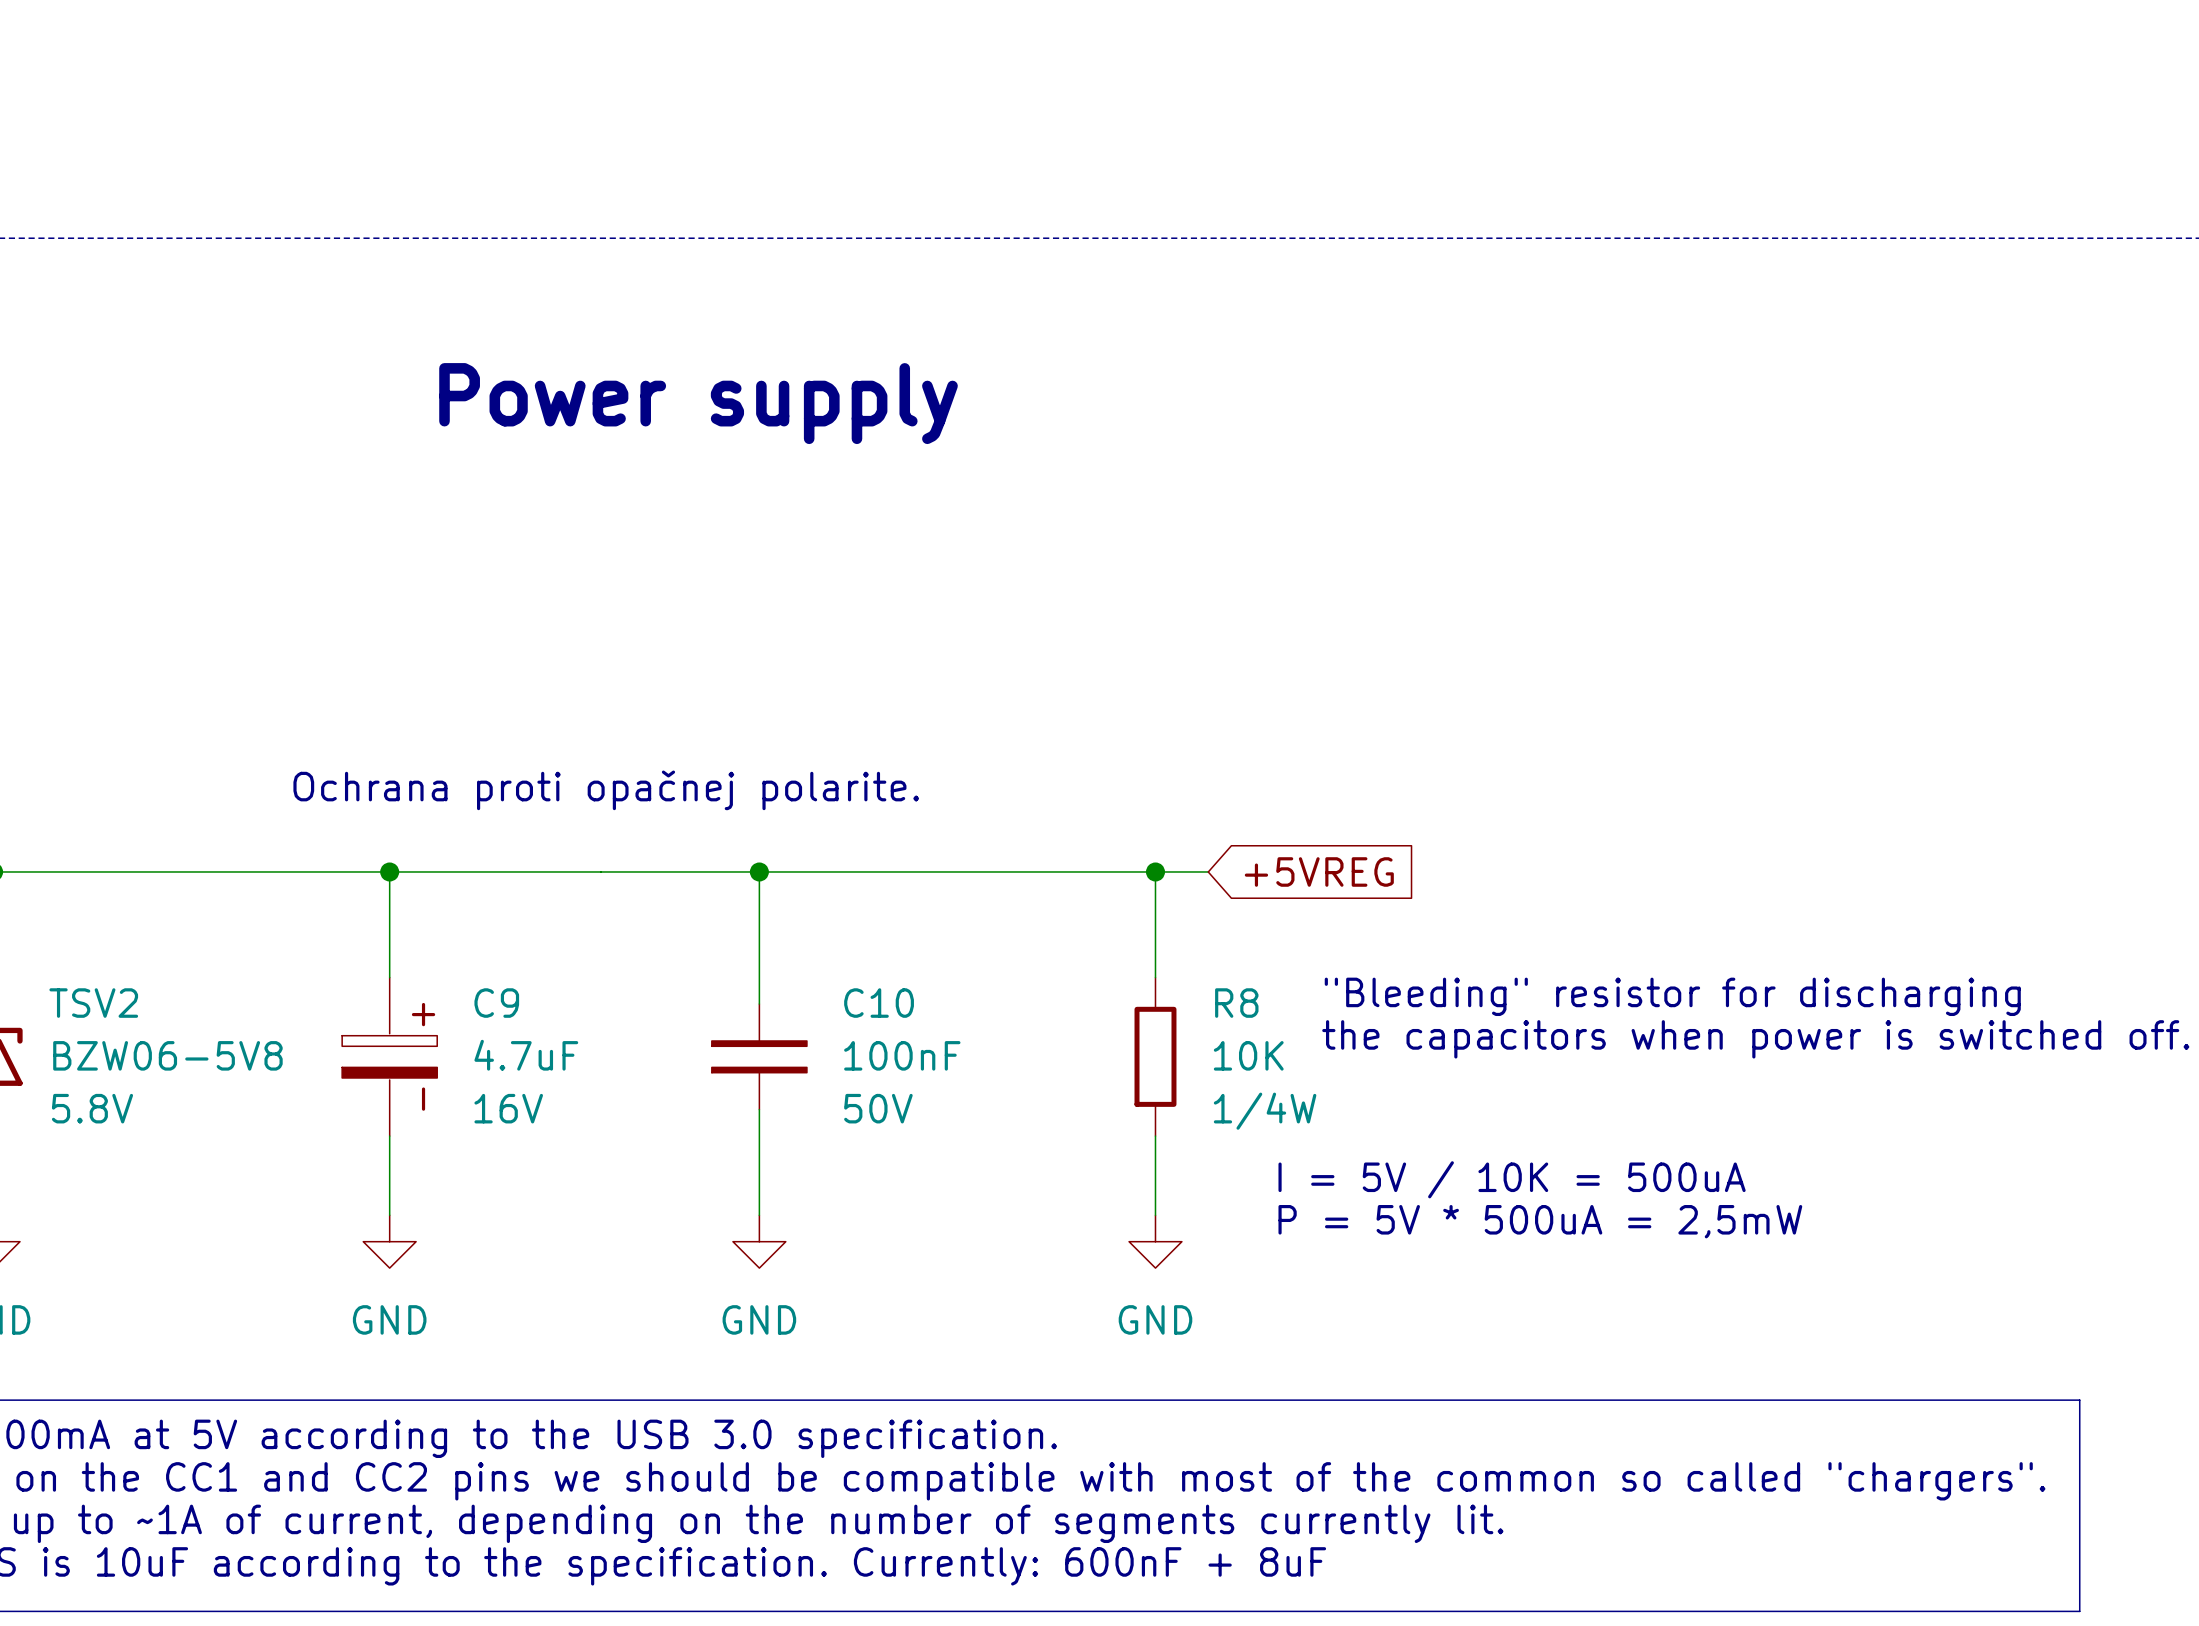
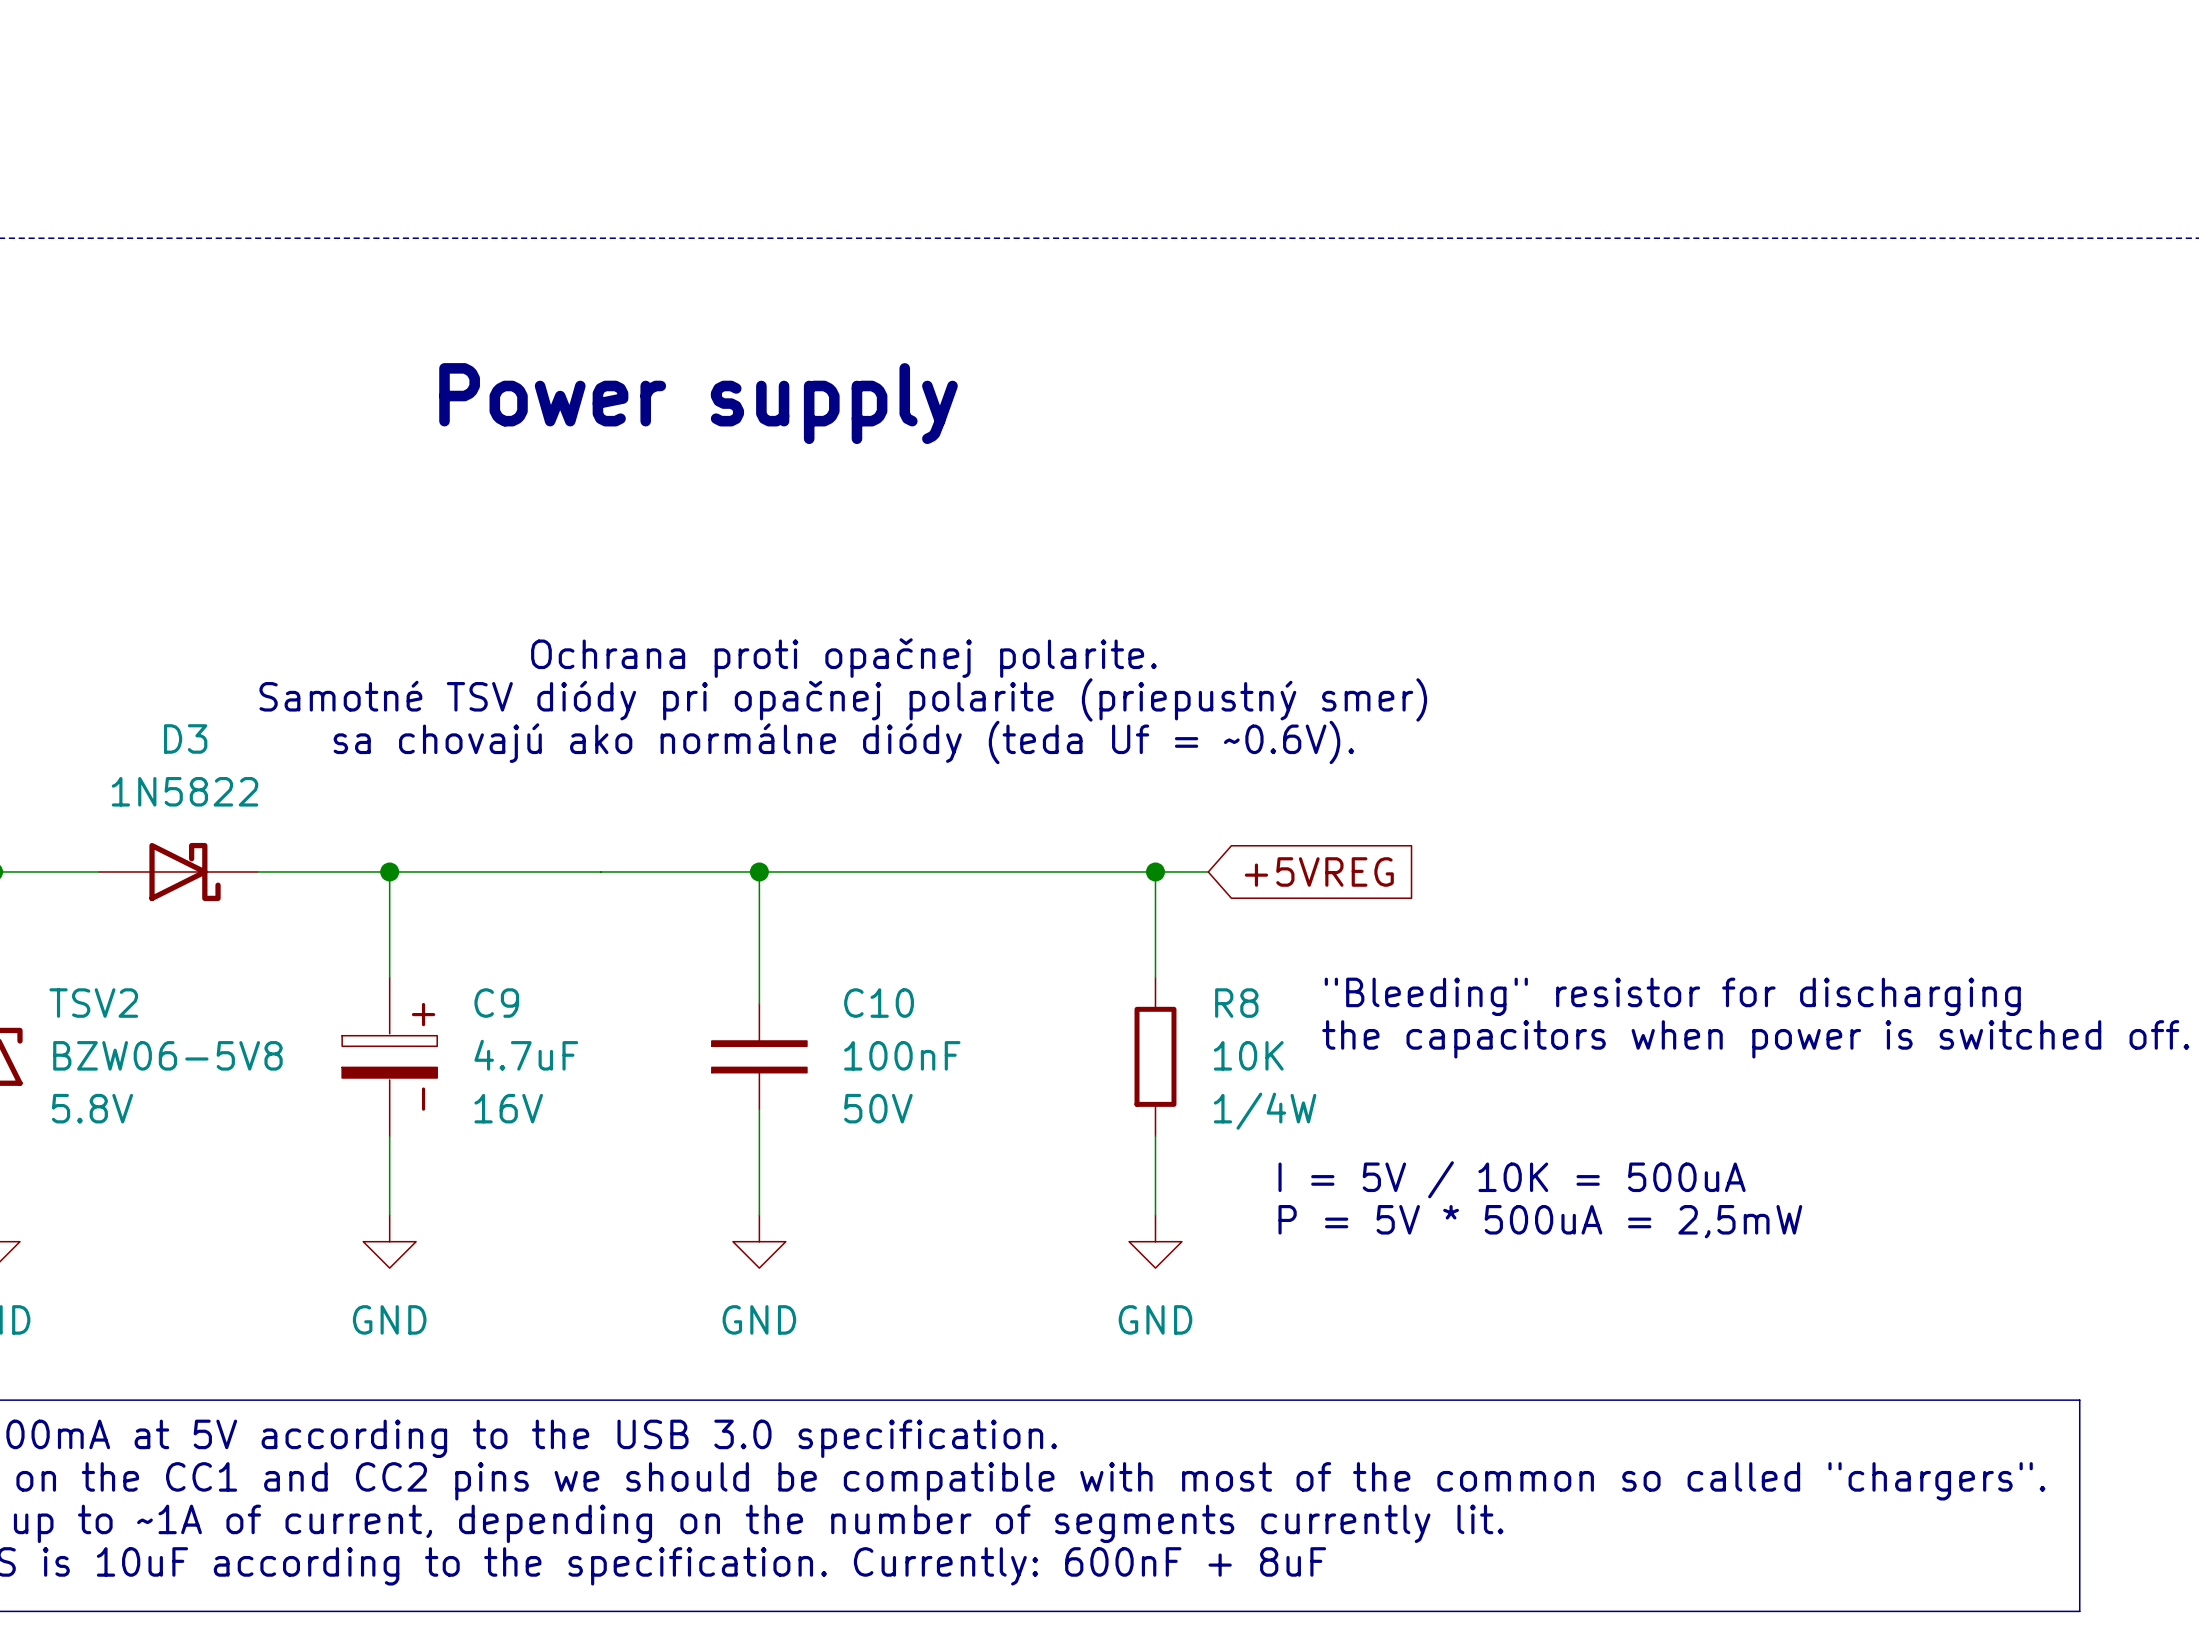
text: none -> Samotné TSV diódy pri opačnej polarite (priepustný smer) (843, 699)
text: none -> sa chovajú ako normálne diódy (teda Uf = ~0.6V). (843, 742)
text position: Ochrana proti opačnej polarite. (606, 790) -> Ochrana proti opačnej polarite. (843, 658)
D3: none -> 1N5822 (178, 871)

